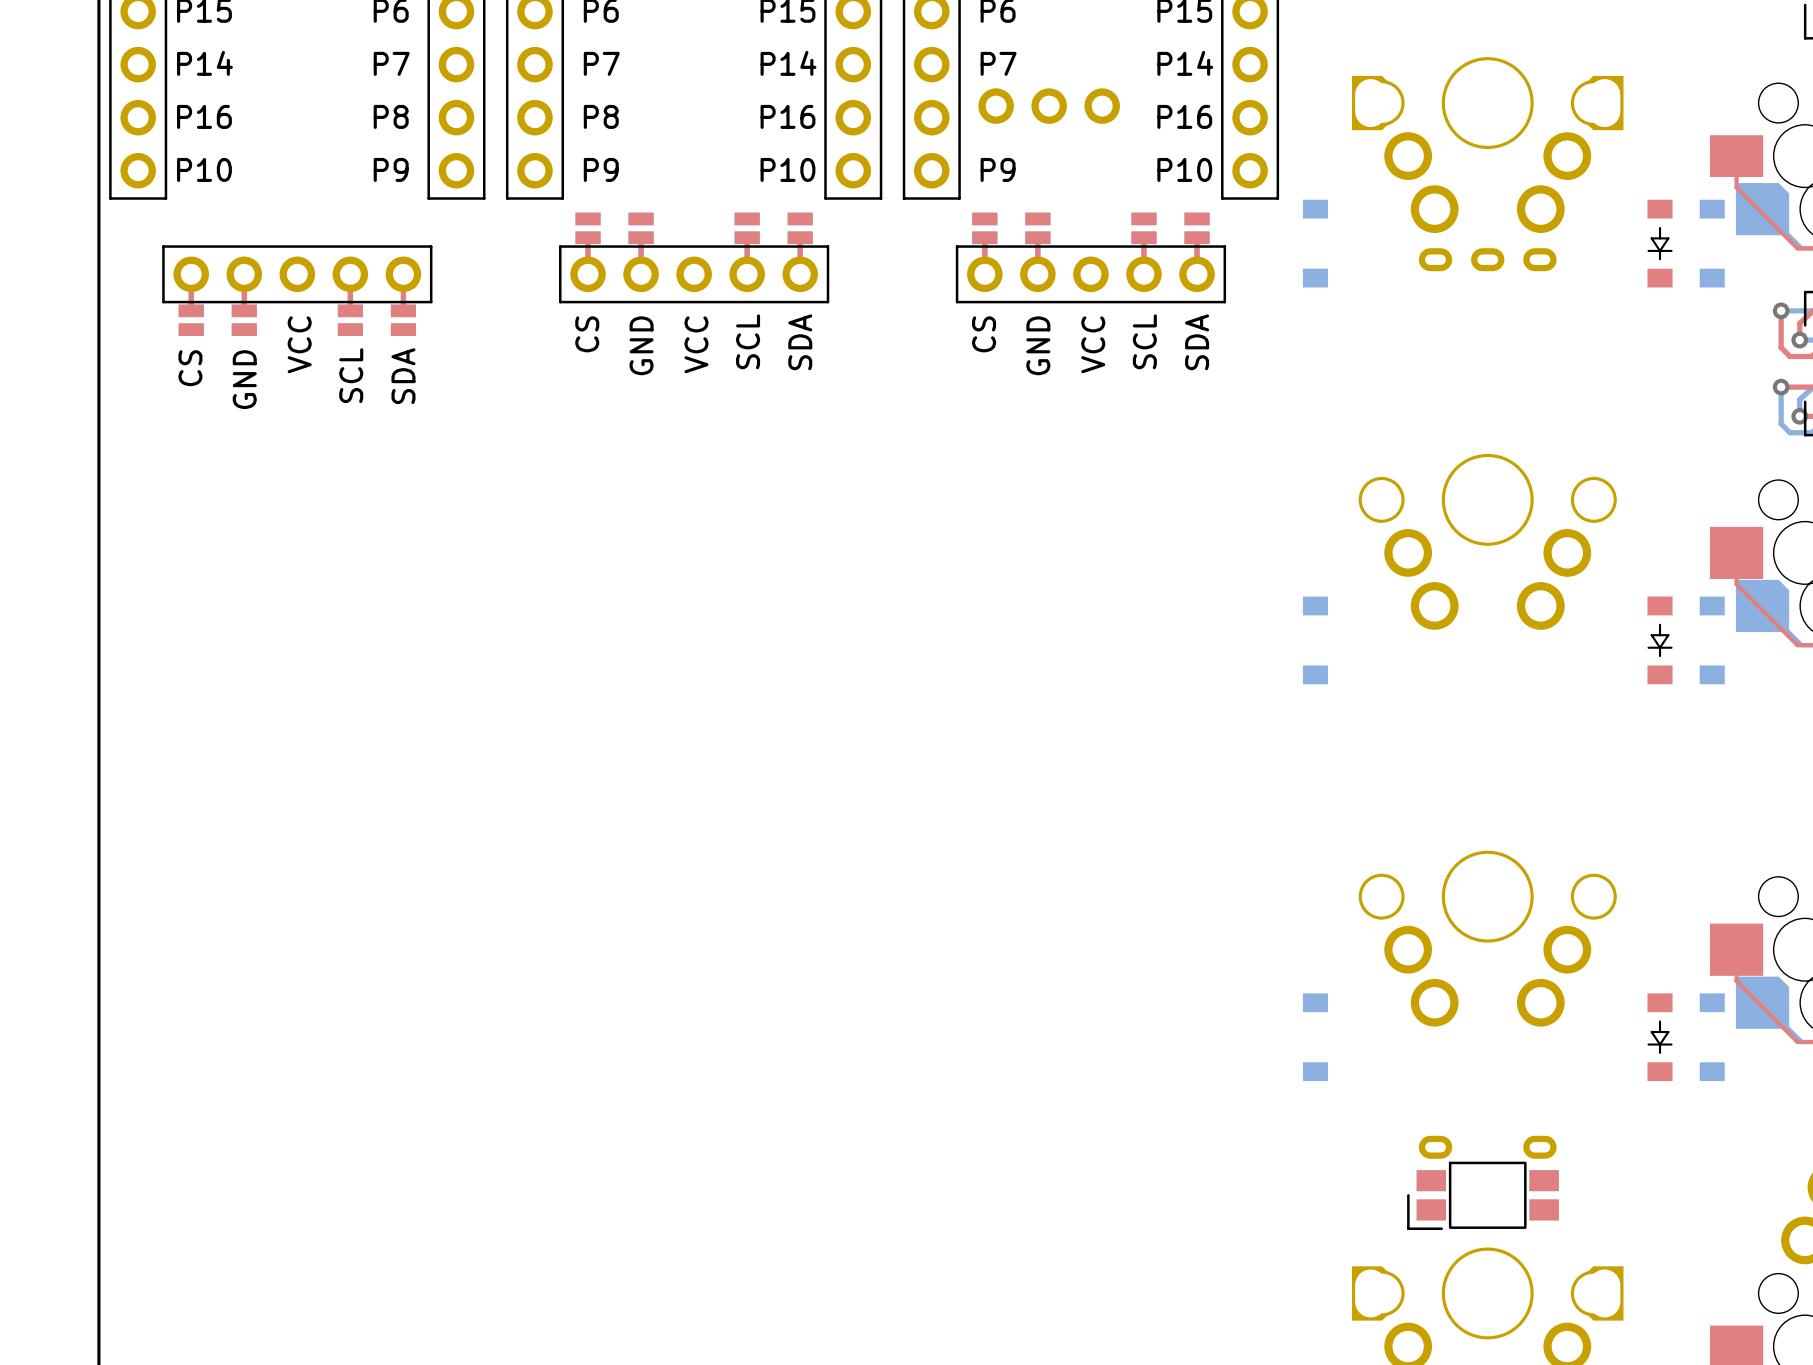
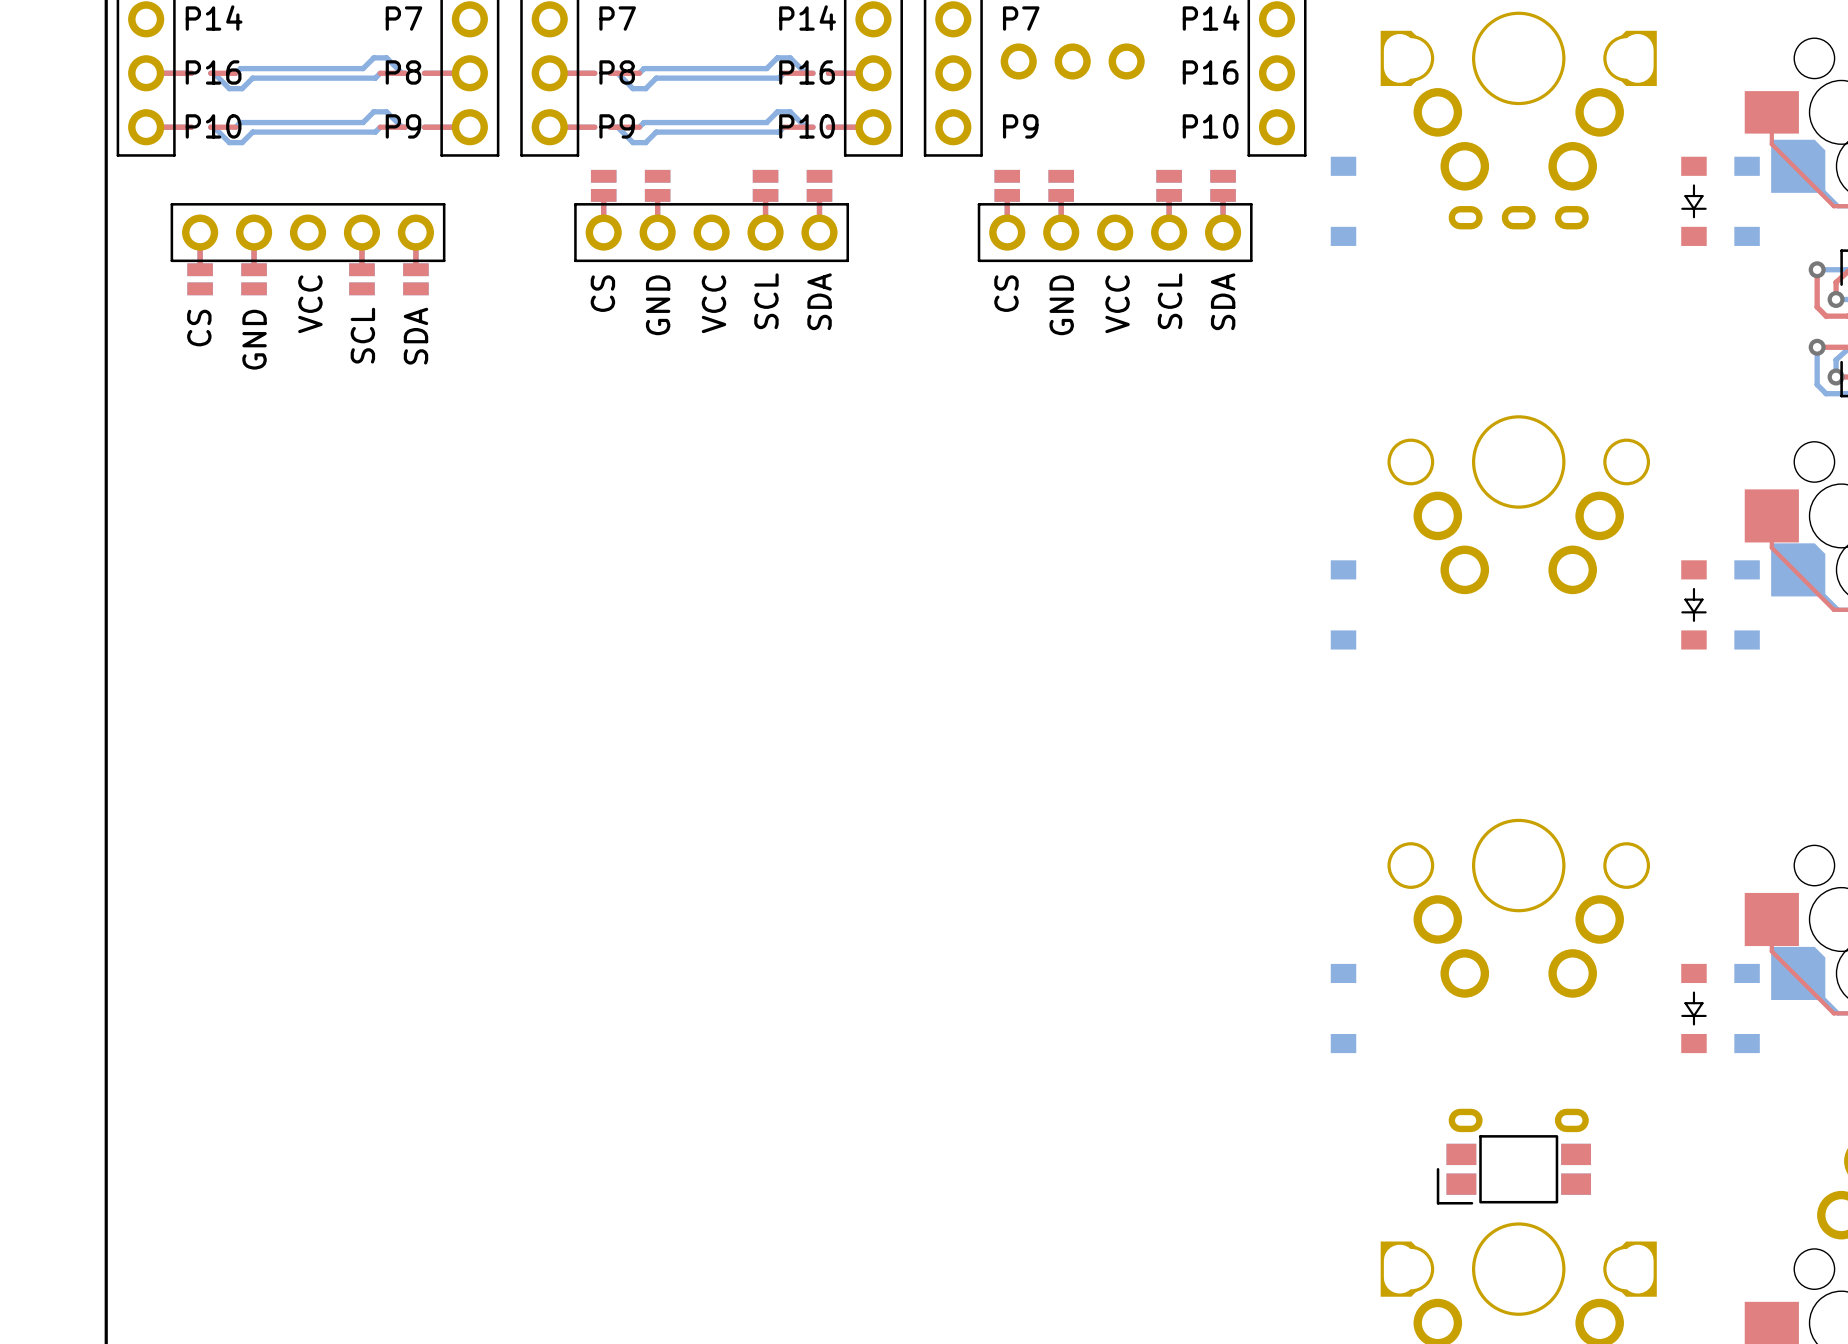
top track: none -> (146, 73) (191, 73)
bottom track: none -> (210, 73) (214, 73) (229, 88) (242, 88) (252, 78) (375, 78) (380, 73)
top track: none -> (210, 73) (235, 73)
bottom track: none -> (235, 73) (240, 68) (363, 68) (373, 57) (386, 57) (402, 73) (405, 73)
top track: none -> (380, 73) (405, 73)
top track: none -> (424, 73) (469, 73)
top track: none -> (549, 73) (594, 73)
bottom track: none -> (610, 73) (617, 73) (632, 88) (645, 88) (656, 78) (778, 78) (783, 73)
top track: none -> (610, 73) (639, 73)
bottom track: none -> (639, 73) (644, 68) (766, 68) (777, 57) (790, 57) (805, 73) (813, 73)
top track: none -> (783, 73) (813, 73)
top track: none -> (828, 73) (873, 73)
top track: none -> (146, 127) (191, 127)
bottom track: none -> (210, 127) (214, 127) (229, 142) (242, 142) (252, 132) (375, 132) (380, 127)
top track: none -> (210, 127) (235, 127)
bottom track: none -> (235, 127) (240, 122) (363, 122) (373, 111) (386, 111) (402, 127) (405, 127)
top track: none -> (380, 127) (405, 127)
top track: none -> (424, 127) (469, 127)
top track: none -> (549, 127) (594, 127)
bottom track: none -> (610, 127) (617, 127) (632, 142) (645, 142) (656, 132) (778, 132) (783, 127)
top track: none -> (610, 127) (639, 127)
bottom track: none -> (639, 127) (644, 122) (766, 122) (777, 111) (790, 111) (805, 127) (813, 127)
top track: none -> (783, 127) (813, 127)
top track: none -> (828, 127) (873, 127)

